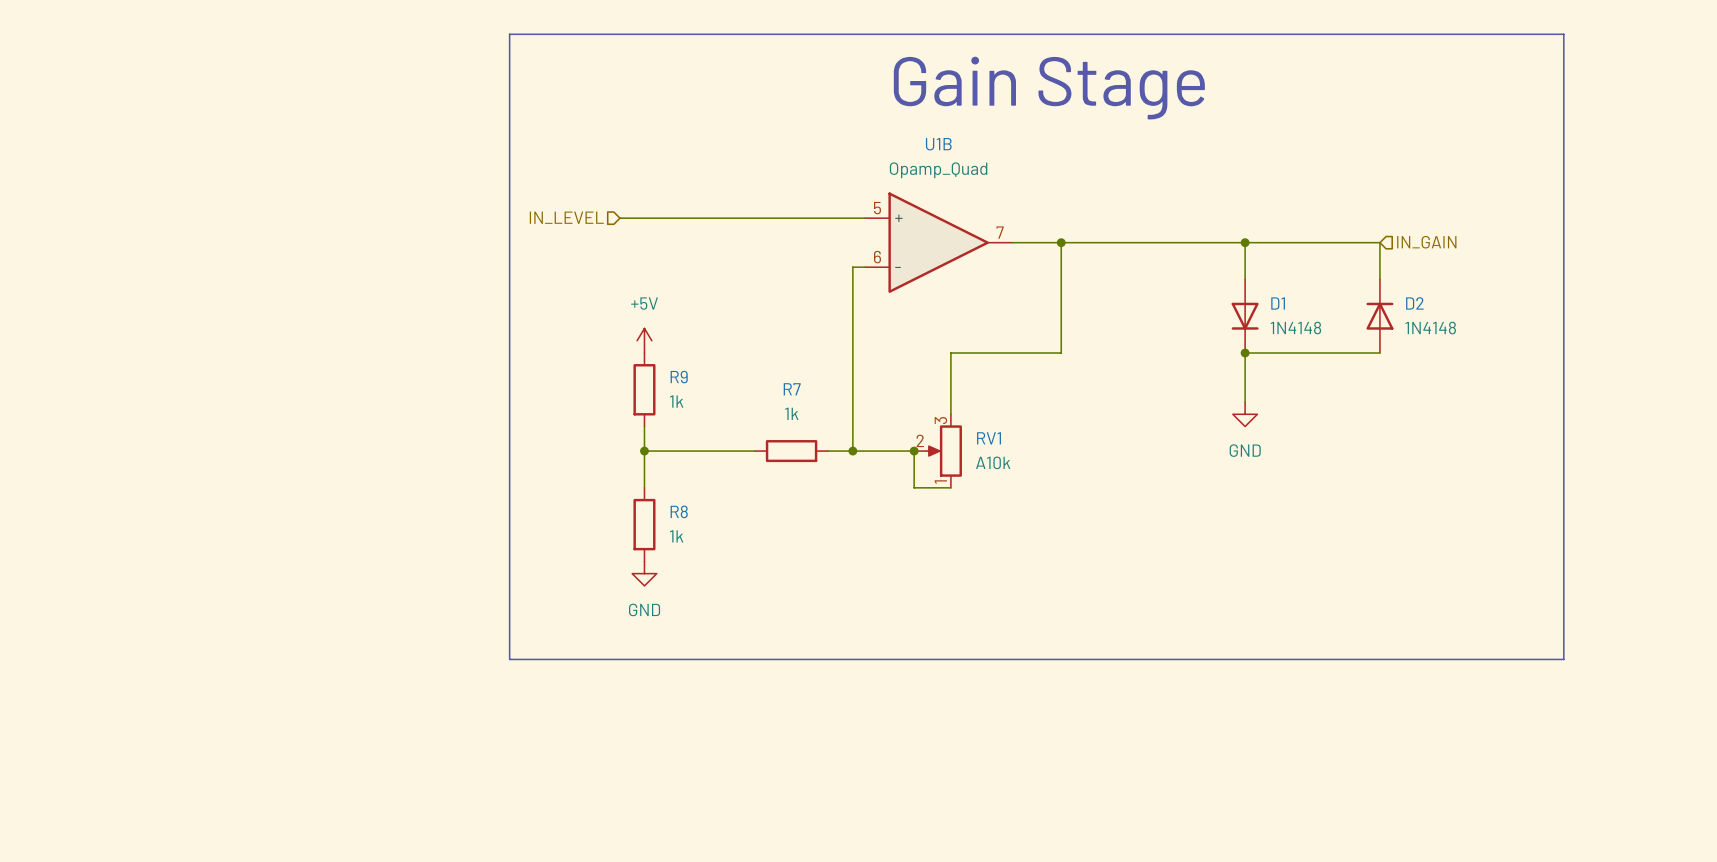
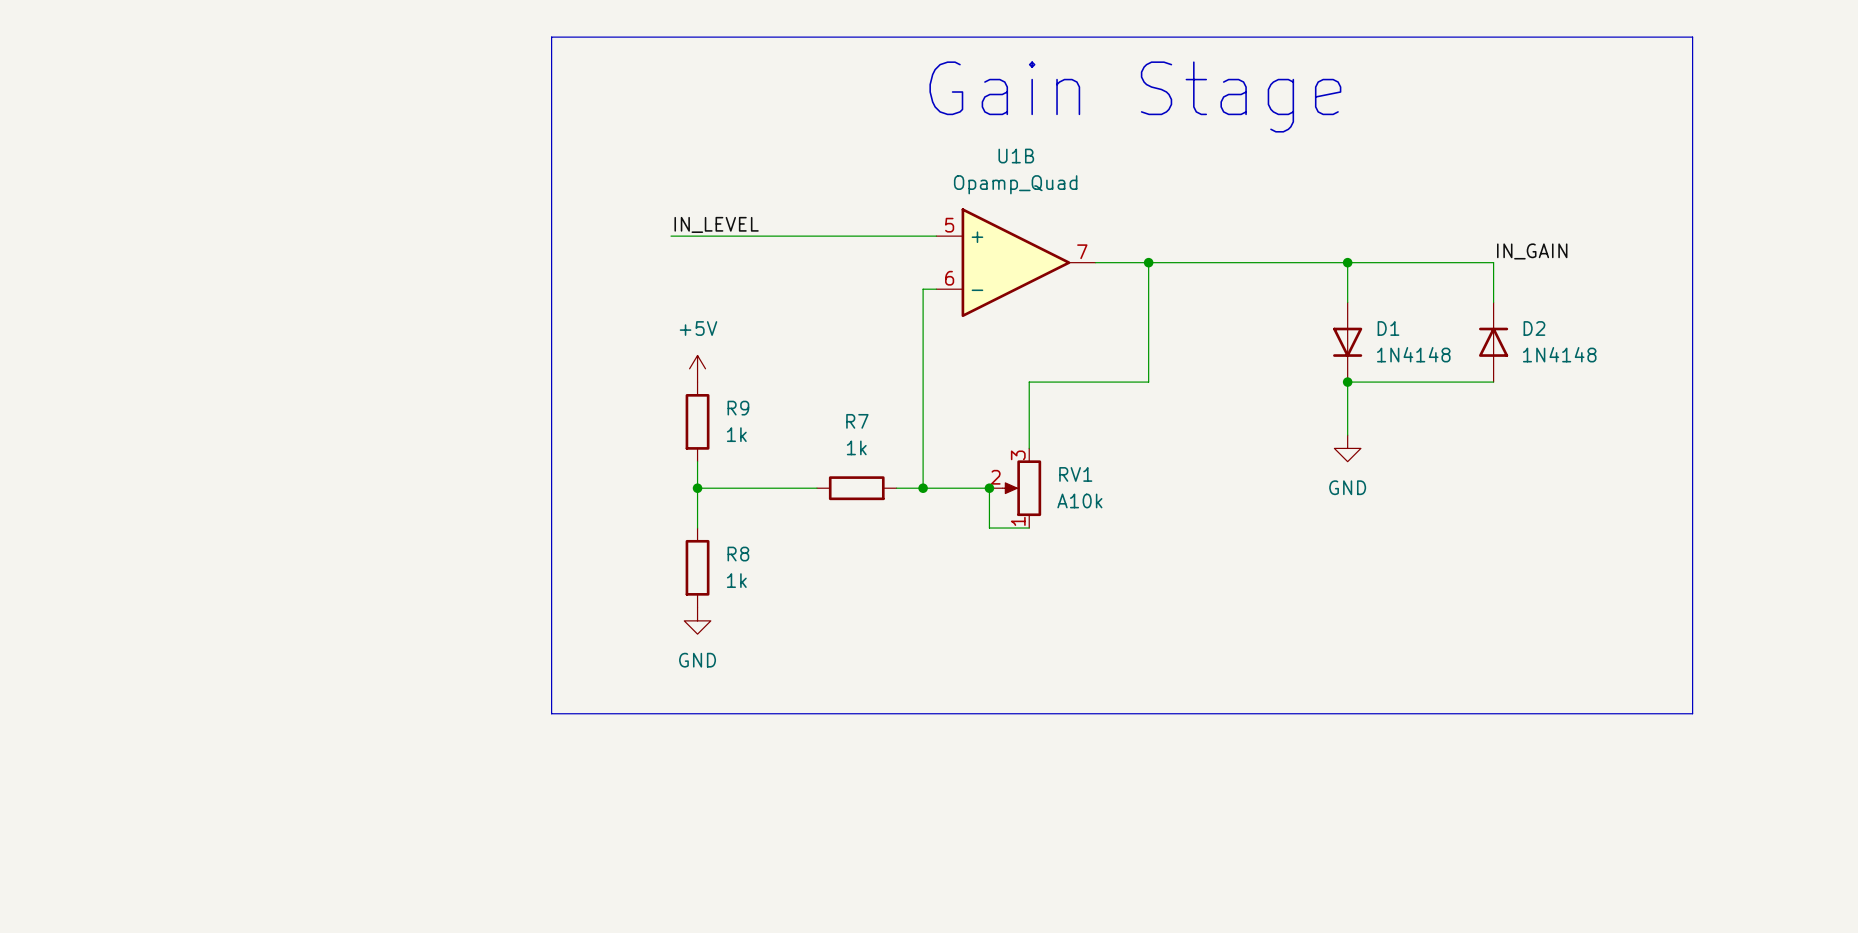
label: none -> IN_LEVEL (716, 224)
hierarchical label: IN_LEVEL (566, 217) -> none
label: none -> IN_GAIN (1532, 251)
hierarchical label: IN_GAIN (1426, 242) -> none

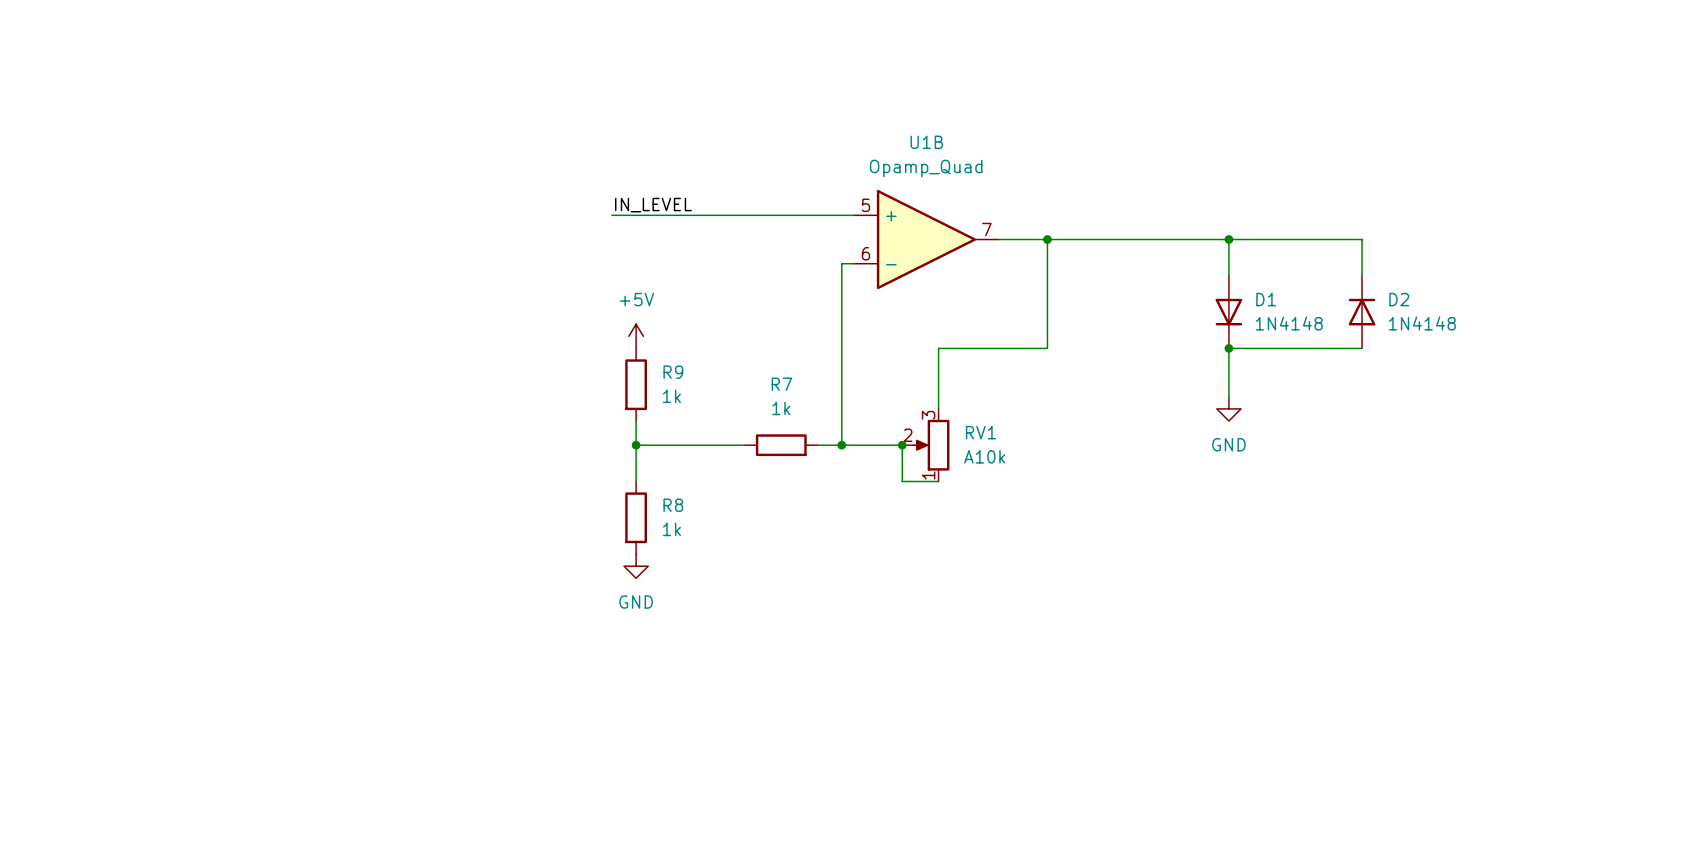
line: (551, 37) (1692, 37) (1692, 713) (551, 713) (551, 37) -> none
text: Gain Stage (1135, 96) -> none
label: IN_GAIN (1532, 251) -> none

